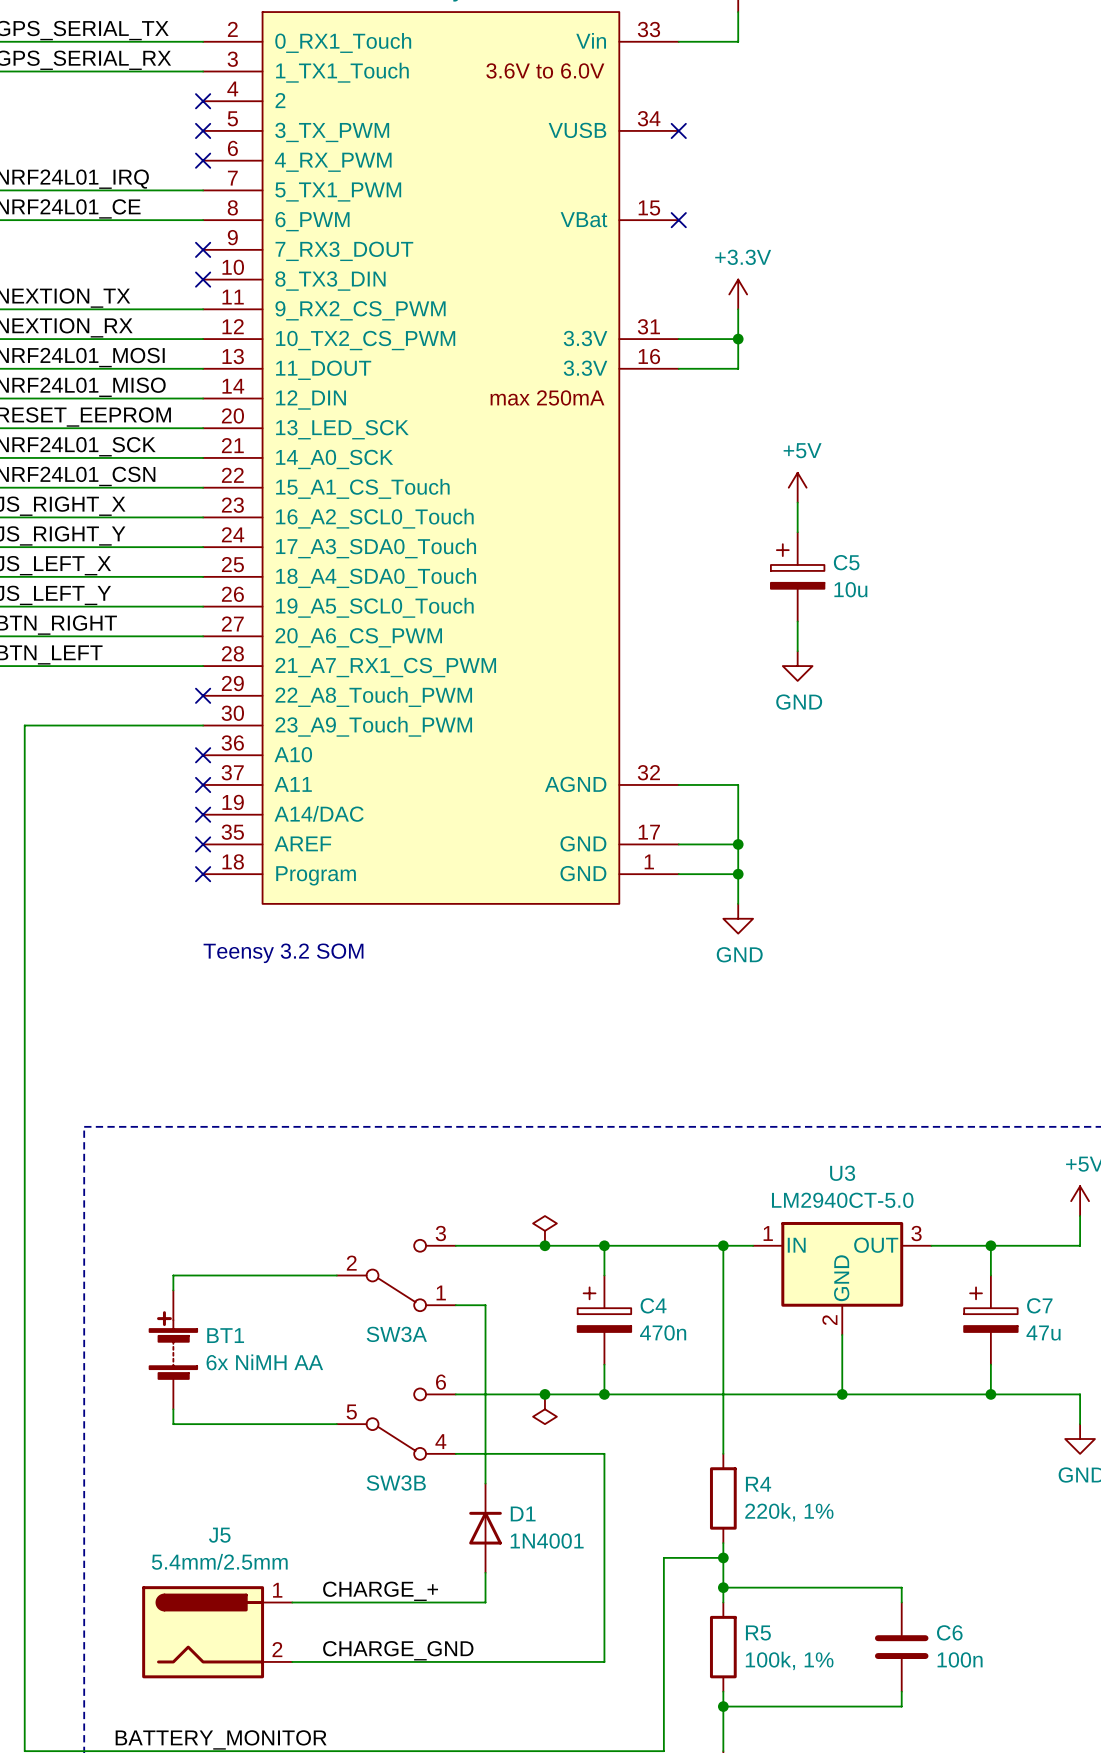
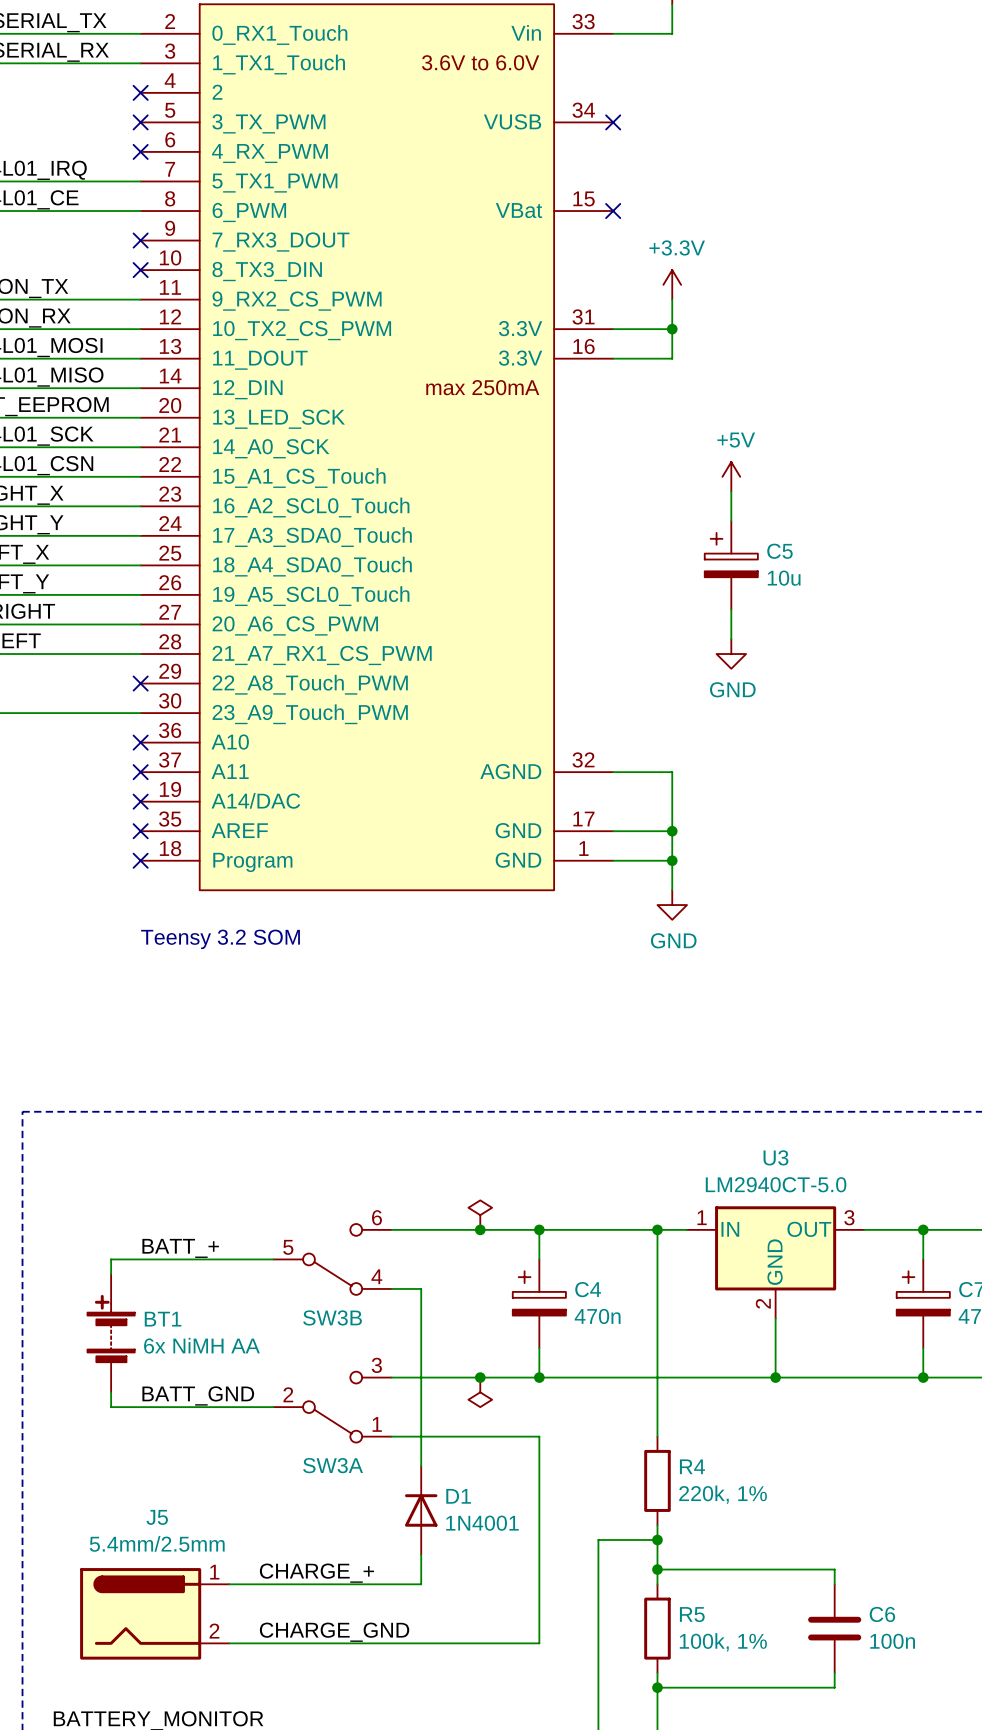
label: none -> BATT_+ (180, 1248)
SW3A position: (396, 1275) -> (332, 1407)
label: none -> BATT_GND (198, 1395)
SW3B position: (396, 1424) -> (332, 1259)

